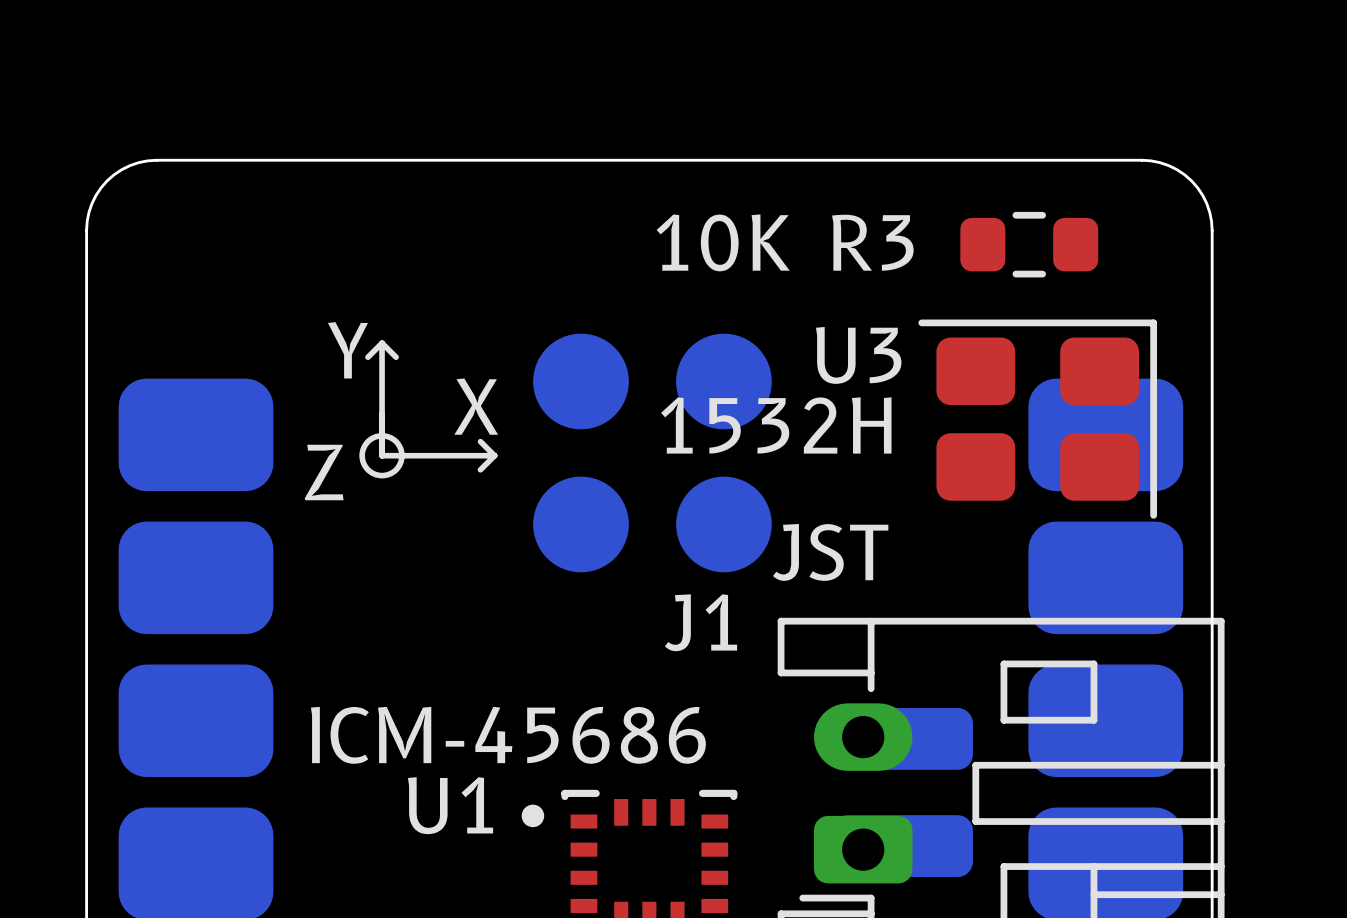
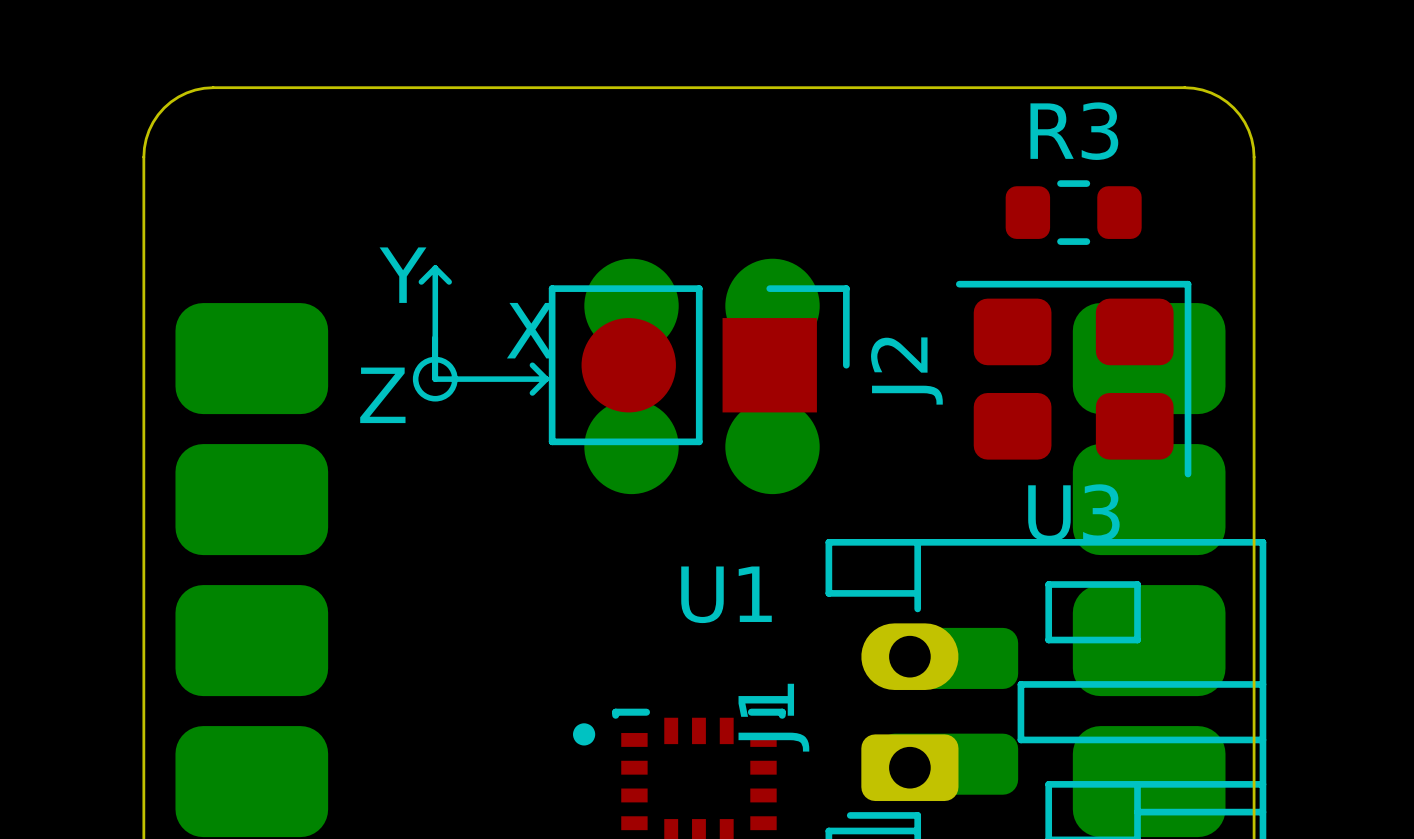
R3 value: 10K (723, 242) -> none
R3 name position: R3 (872, 242) -> R3 (1074, 131)
R3 position: (1029, 244) -> (1073, 212)
U3 name position: U3 (858, 355) -> U3 (1073, 513)
U3 position: (1037, 419) -> (1073, 379)
U3 value: 1532H (776, 425) -> none
J2: none -> (699, 365)
J1 value: JST (830, 552) -> none
J1 name rotation: 0° (701, 622) -> 90° counterclockwise (773, 717)
J1 name position: J1 (701, 622) -> J1 (773, 717)
U1 value: ICM-45686 (508, 735) -> none
U1 name position: U1 (450, 805) -> U1 (726, 594)

